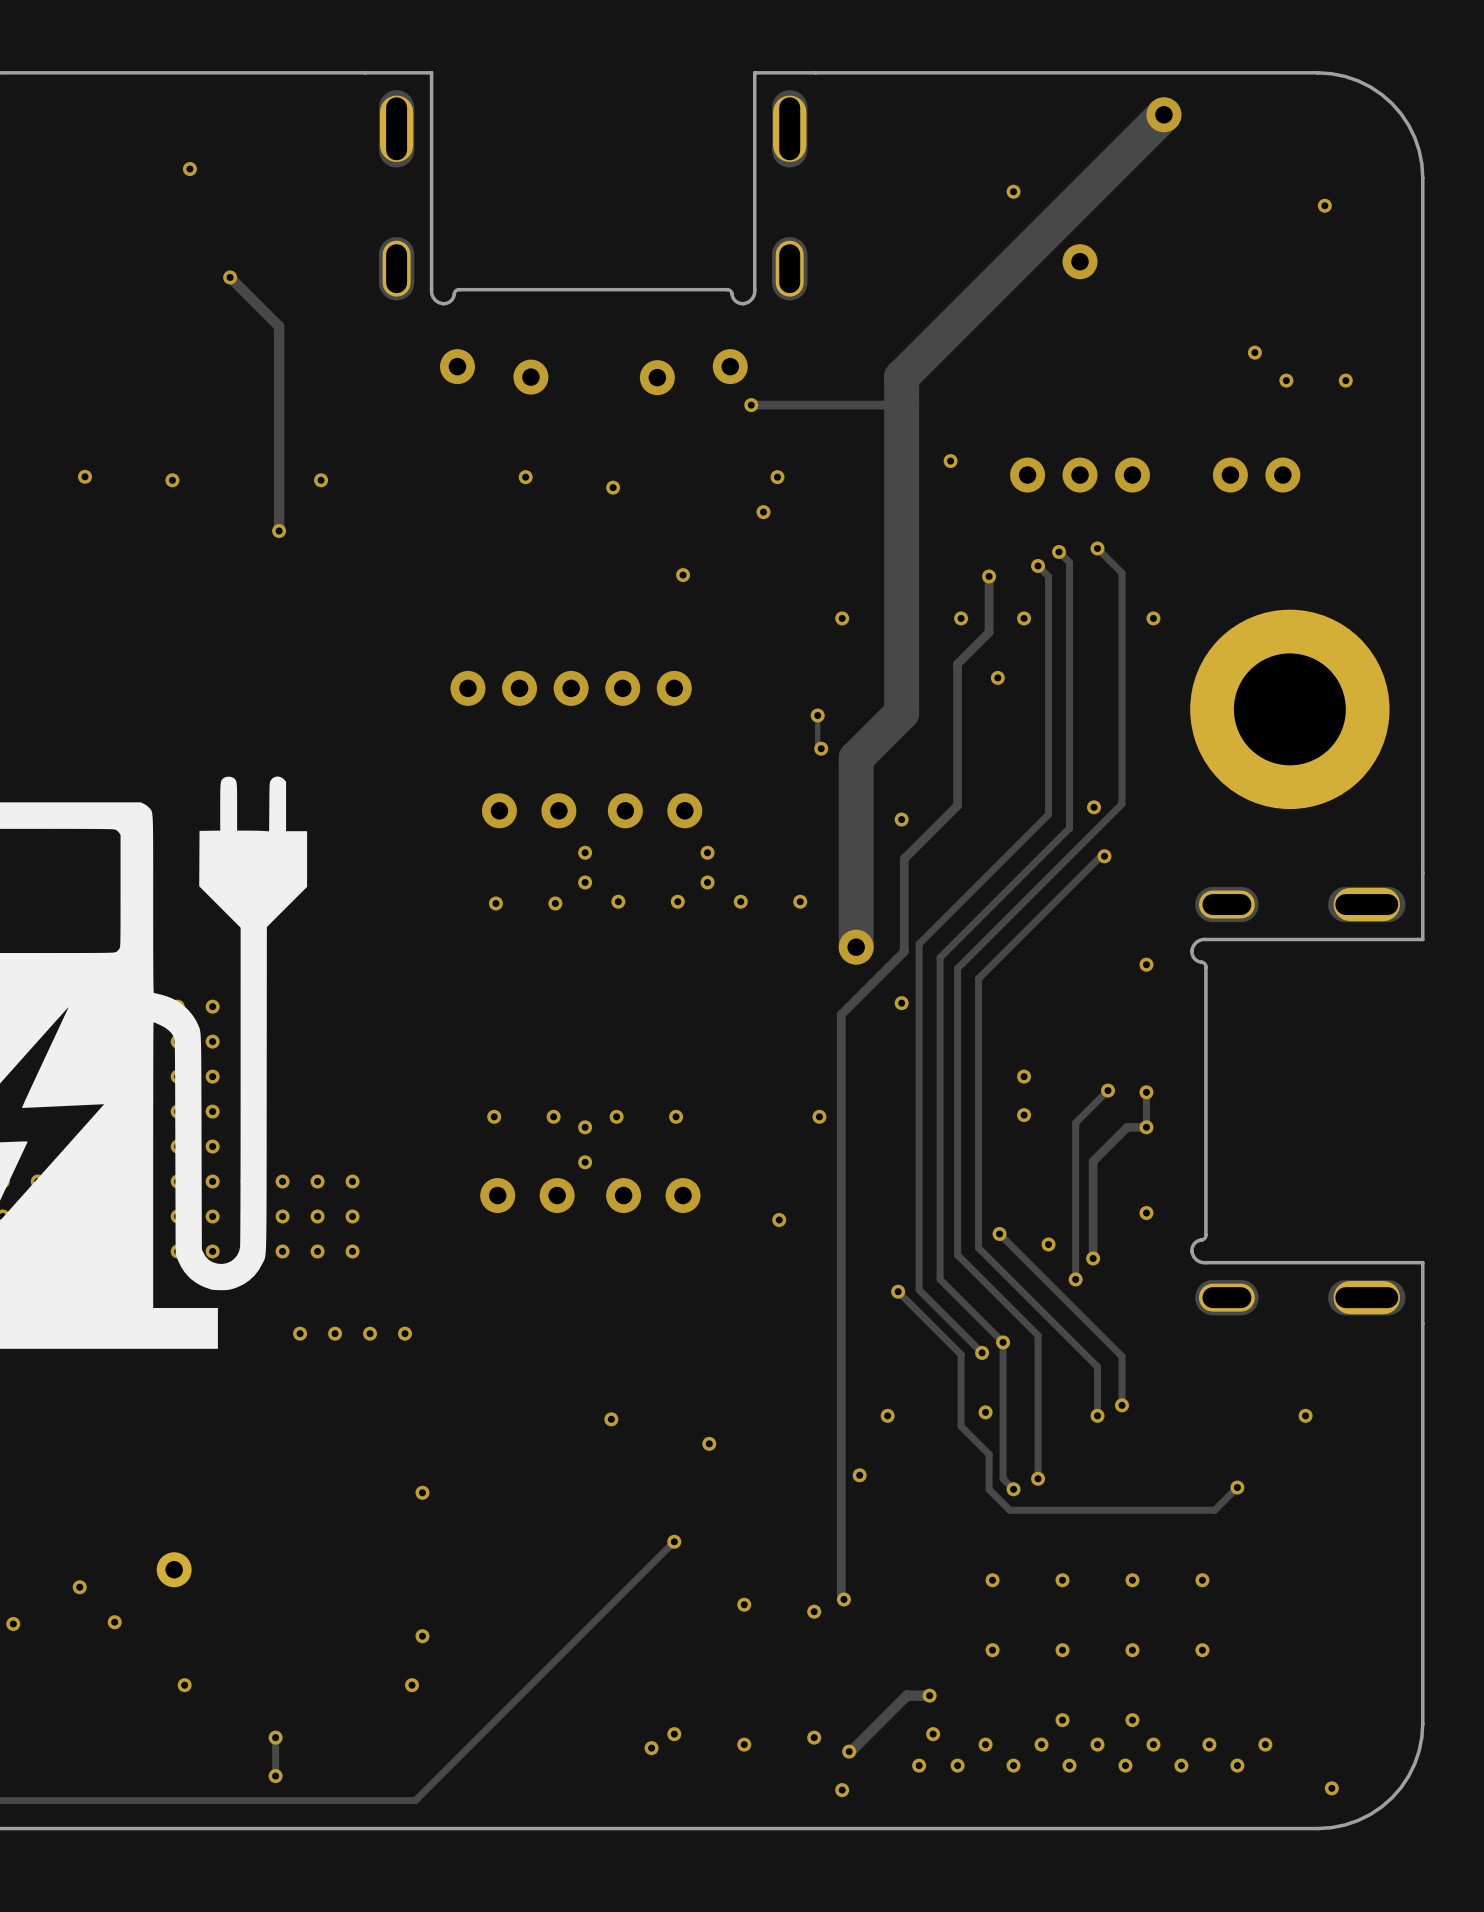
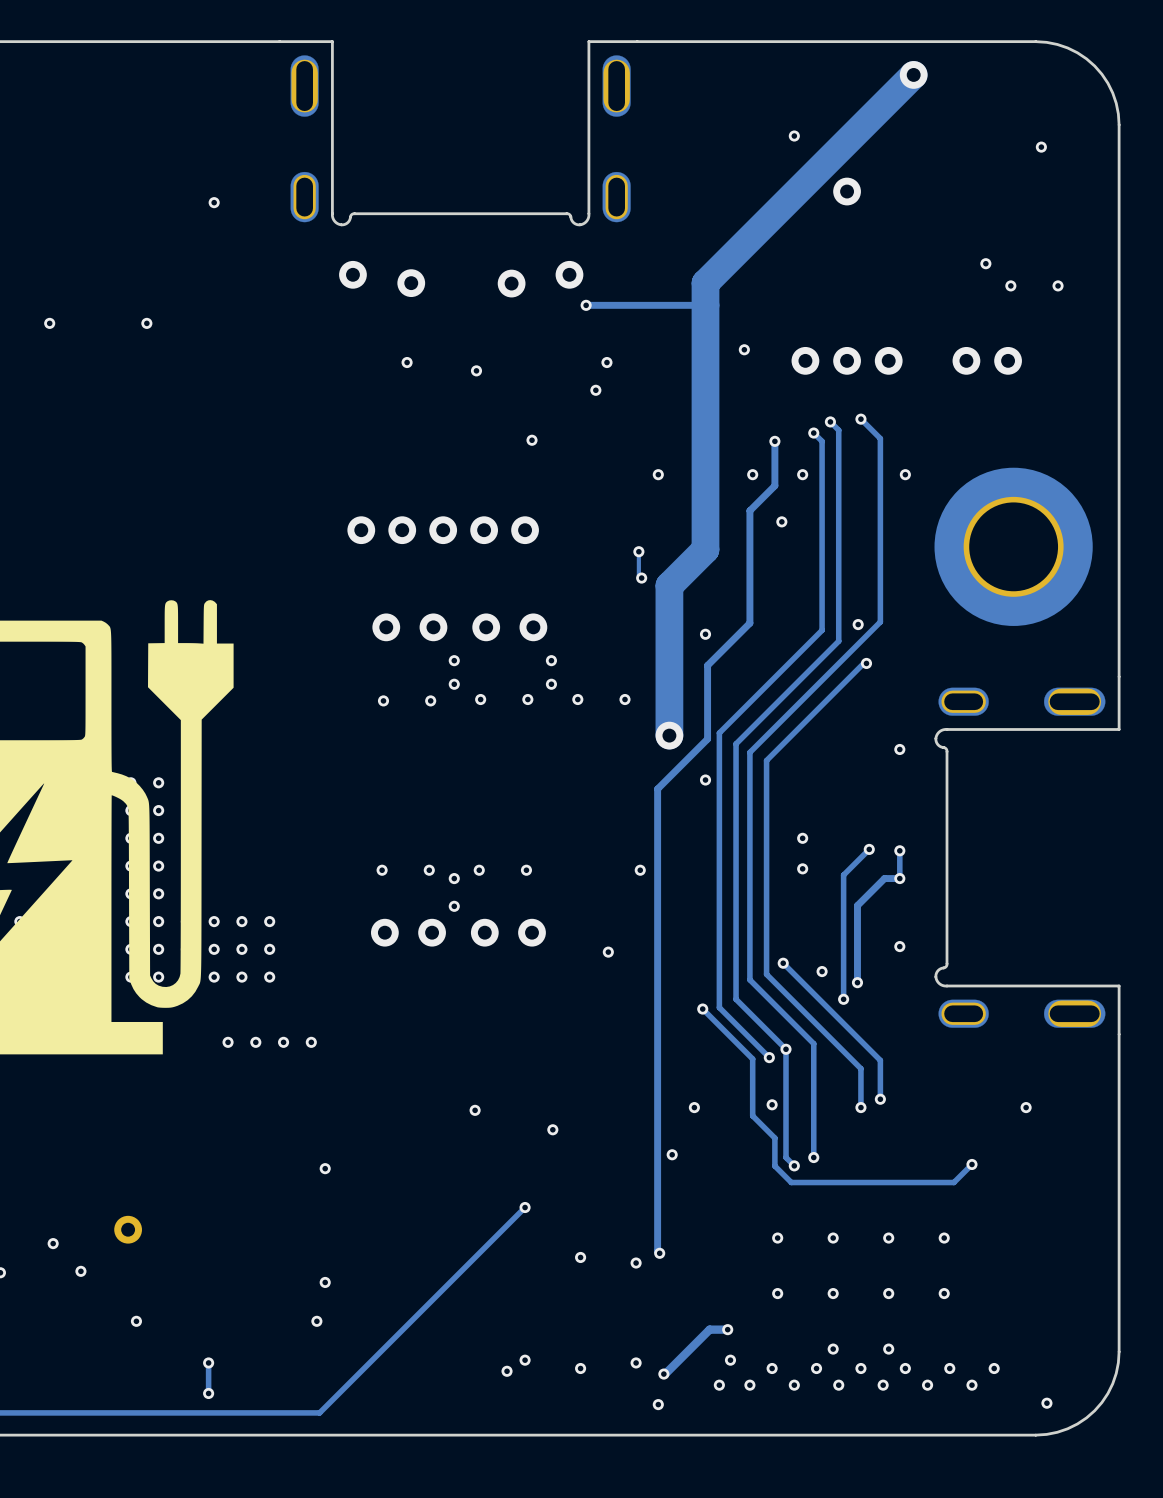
via: (189, 169) -> none
track: (230, 277) (279, 326) (279, 531) -> none
via position: (230, 277) -> (214, 202)
via: none -> (146, 323)
via position: (84, 476) -> (49, 323)
via: (172, 480) -> none
via: (321, 480) -> none
via: (279, 531) -> none

